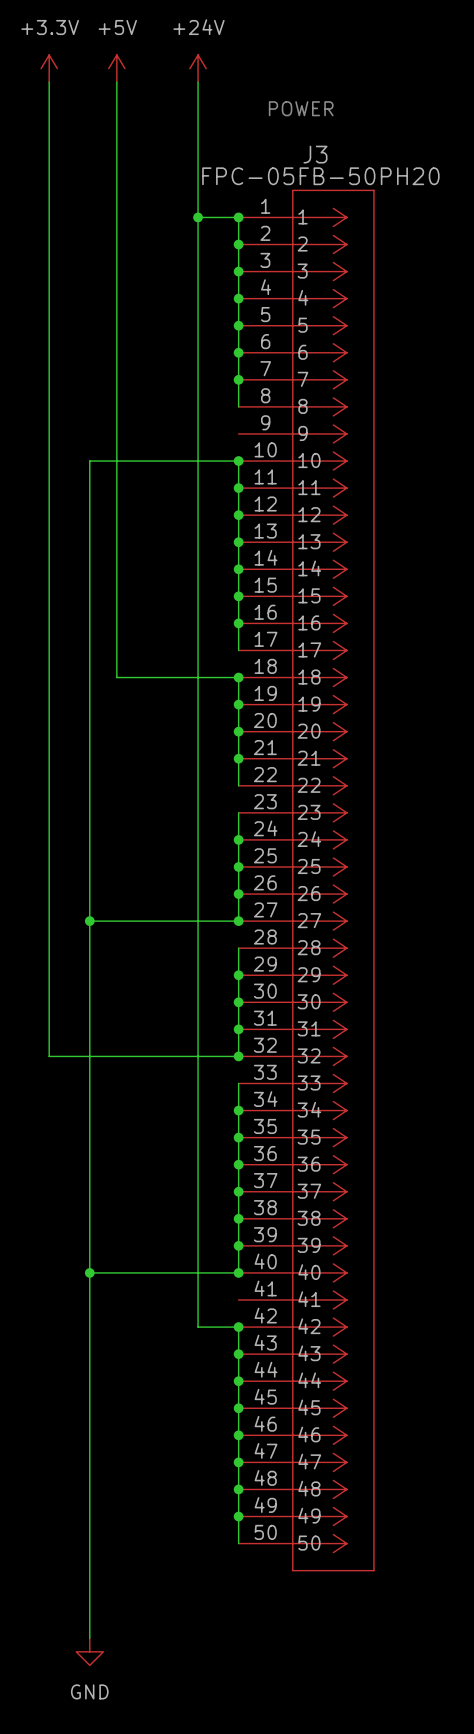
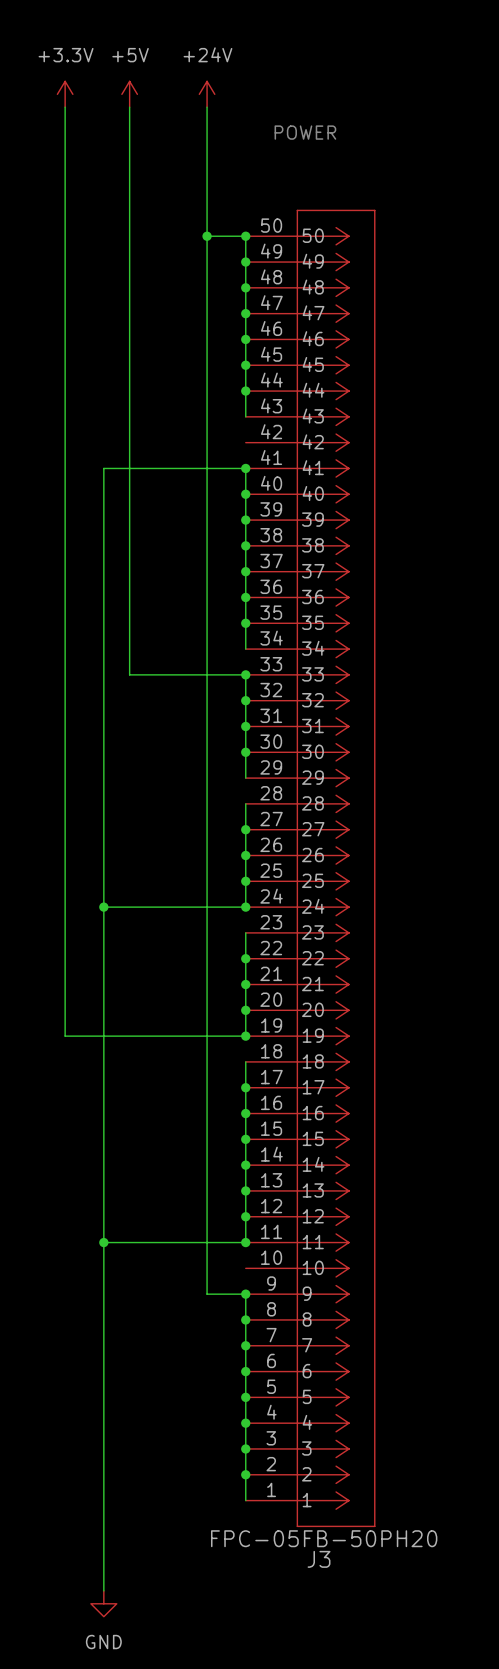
J3 flip: as is (333, 880) -> up-down (336, 868)

